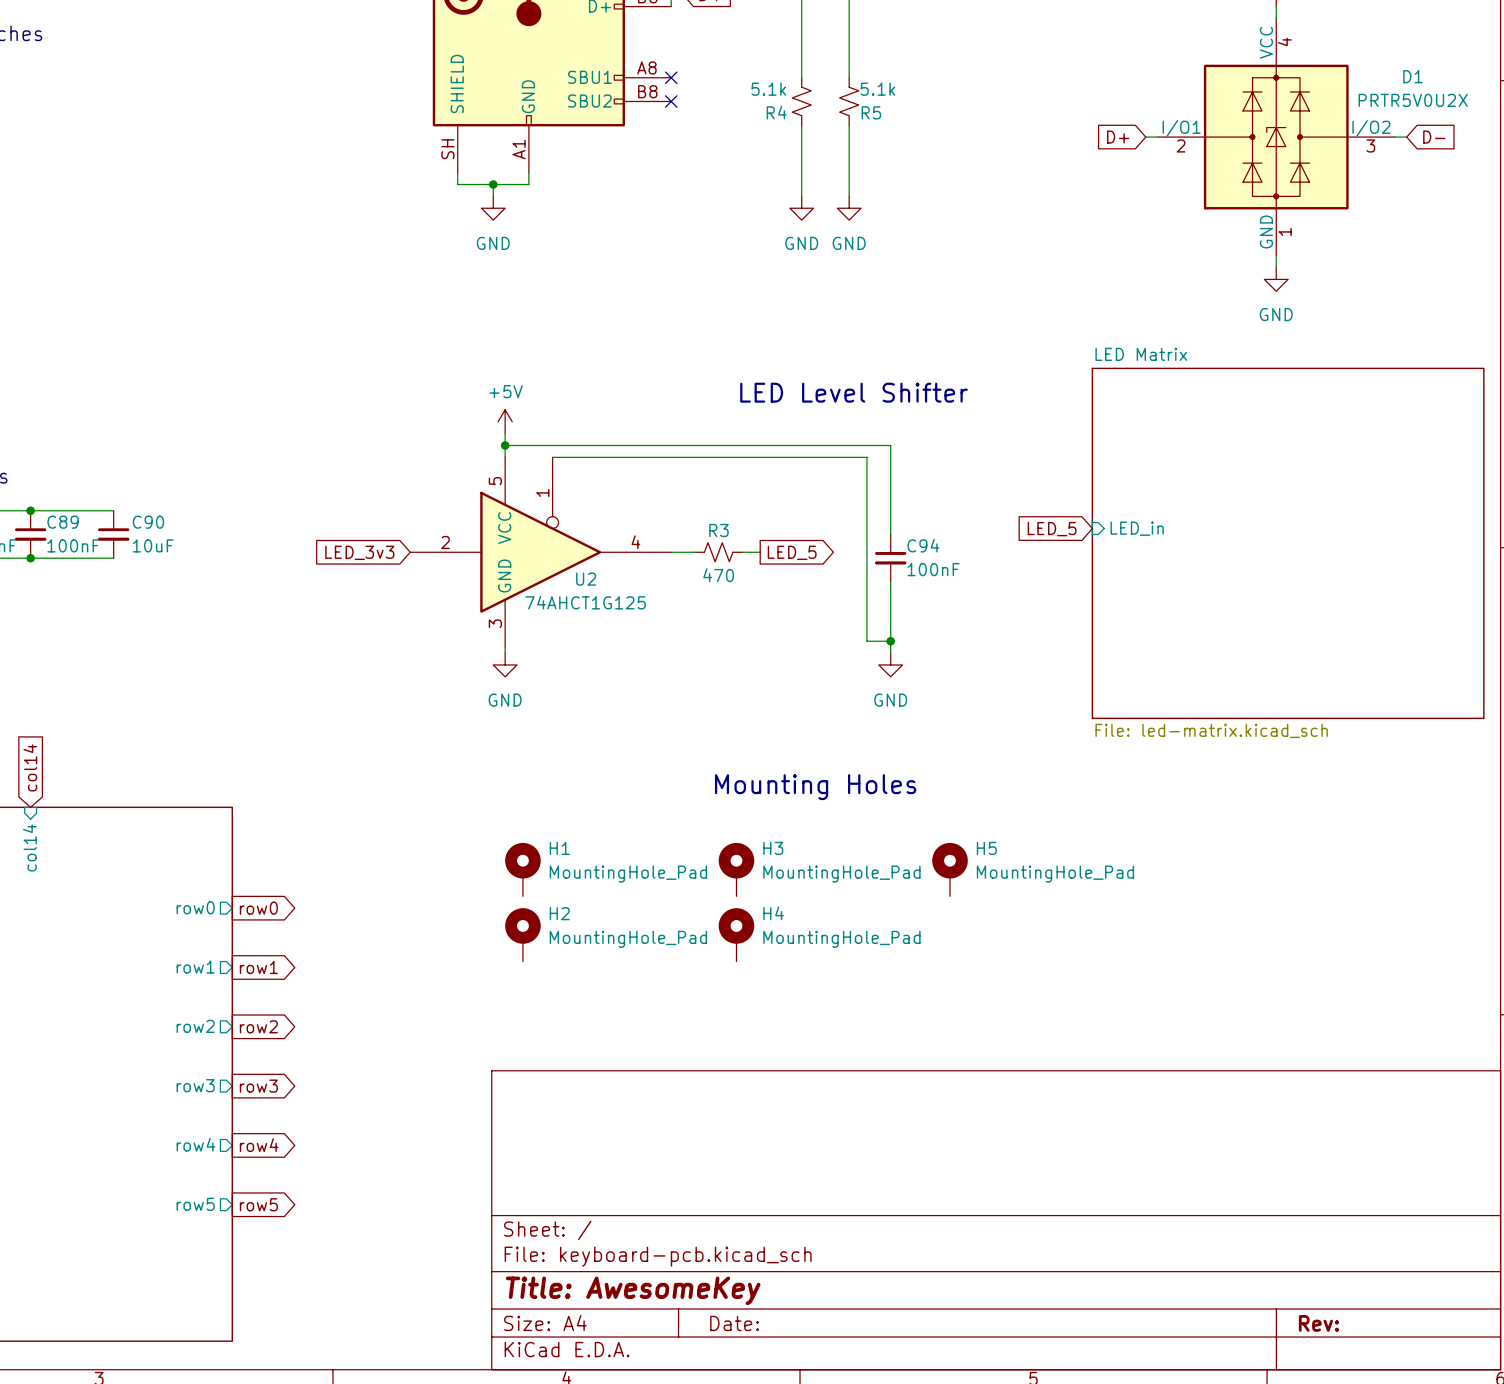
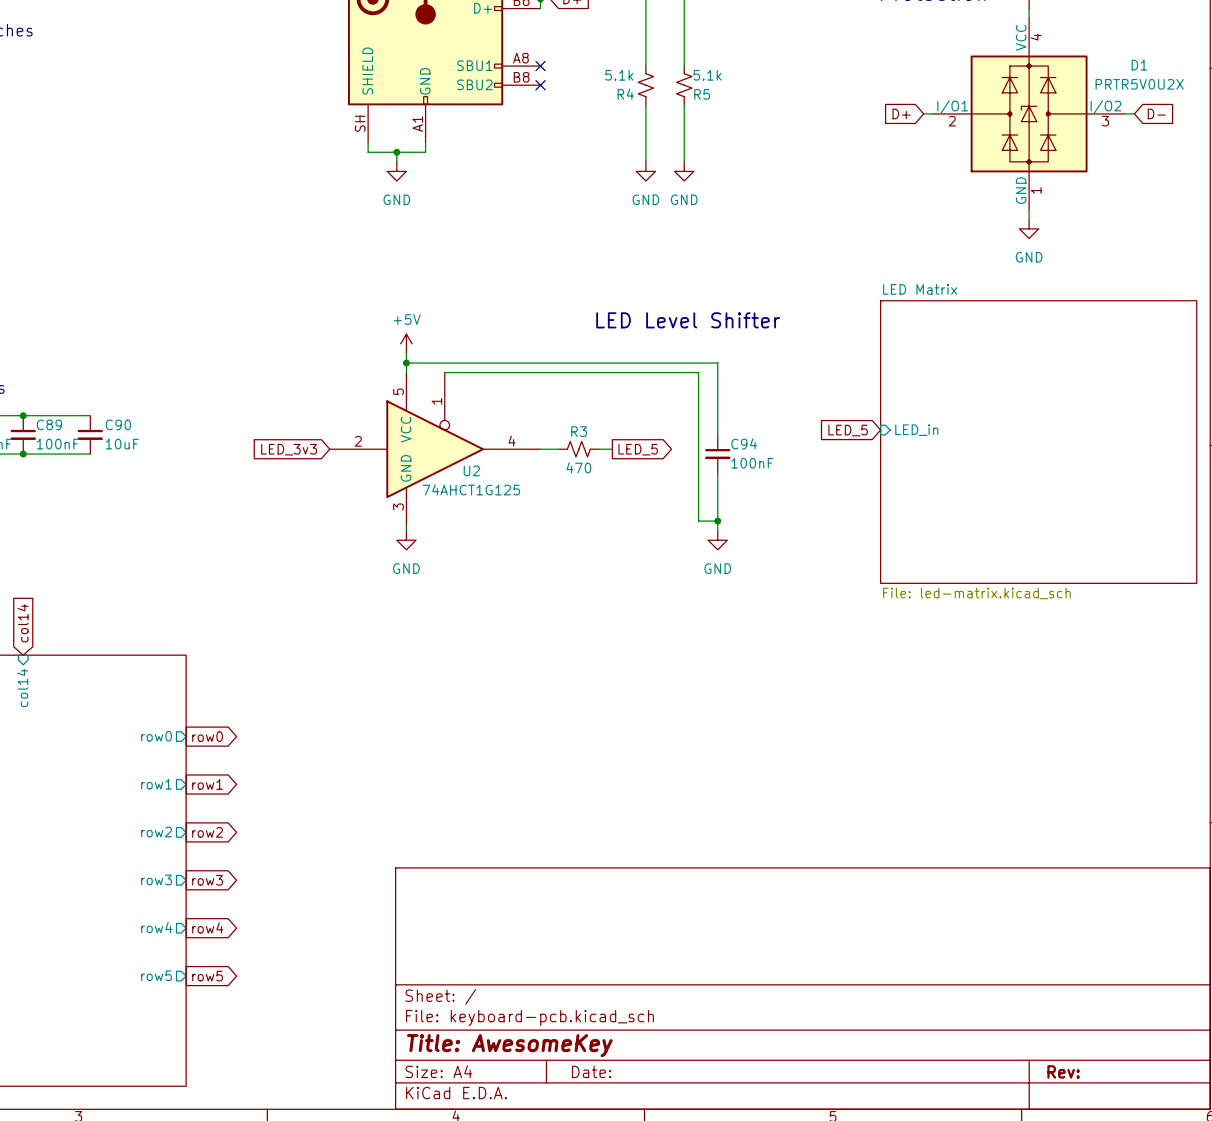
text: Mounting Holes (815, 787) -> none
H1: MountingHole_Pad (522, 869) -> none
H3: MountingHole_Pad (736, 869) -> none
H5: MountingHole_Pad (950, 869) -> none
H2: MountingHole_Pad (522, 934) -> none
H4: MountingHole_Pad (736, 934) -> none

